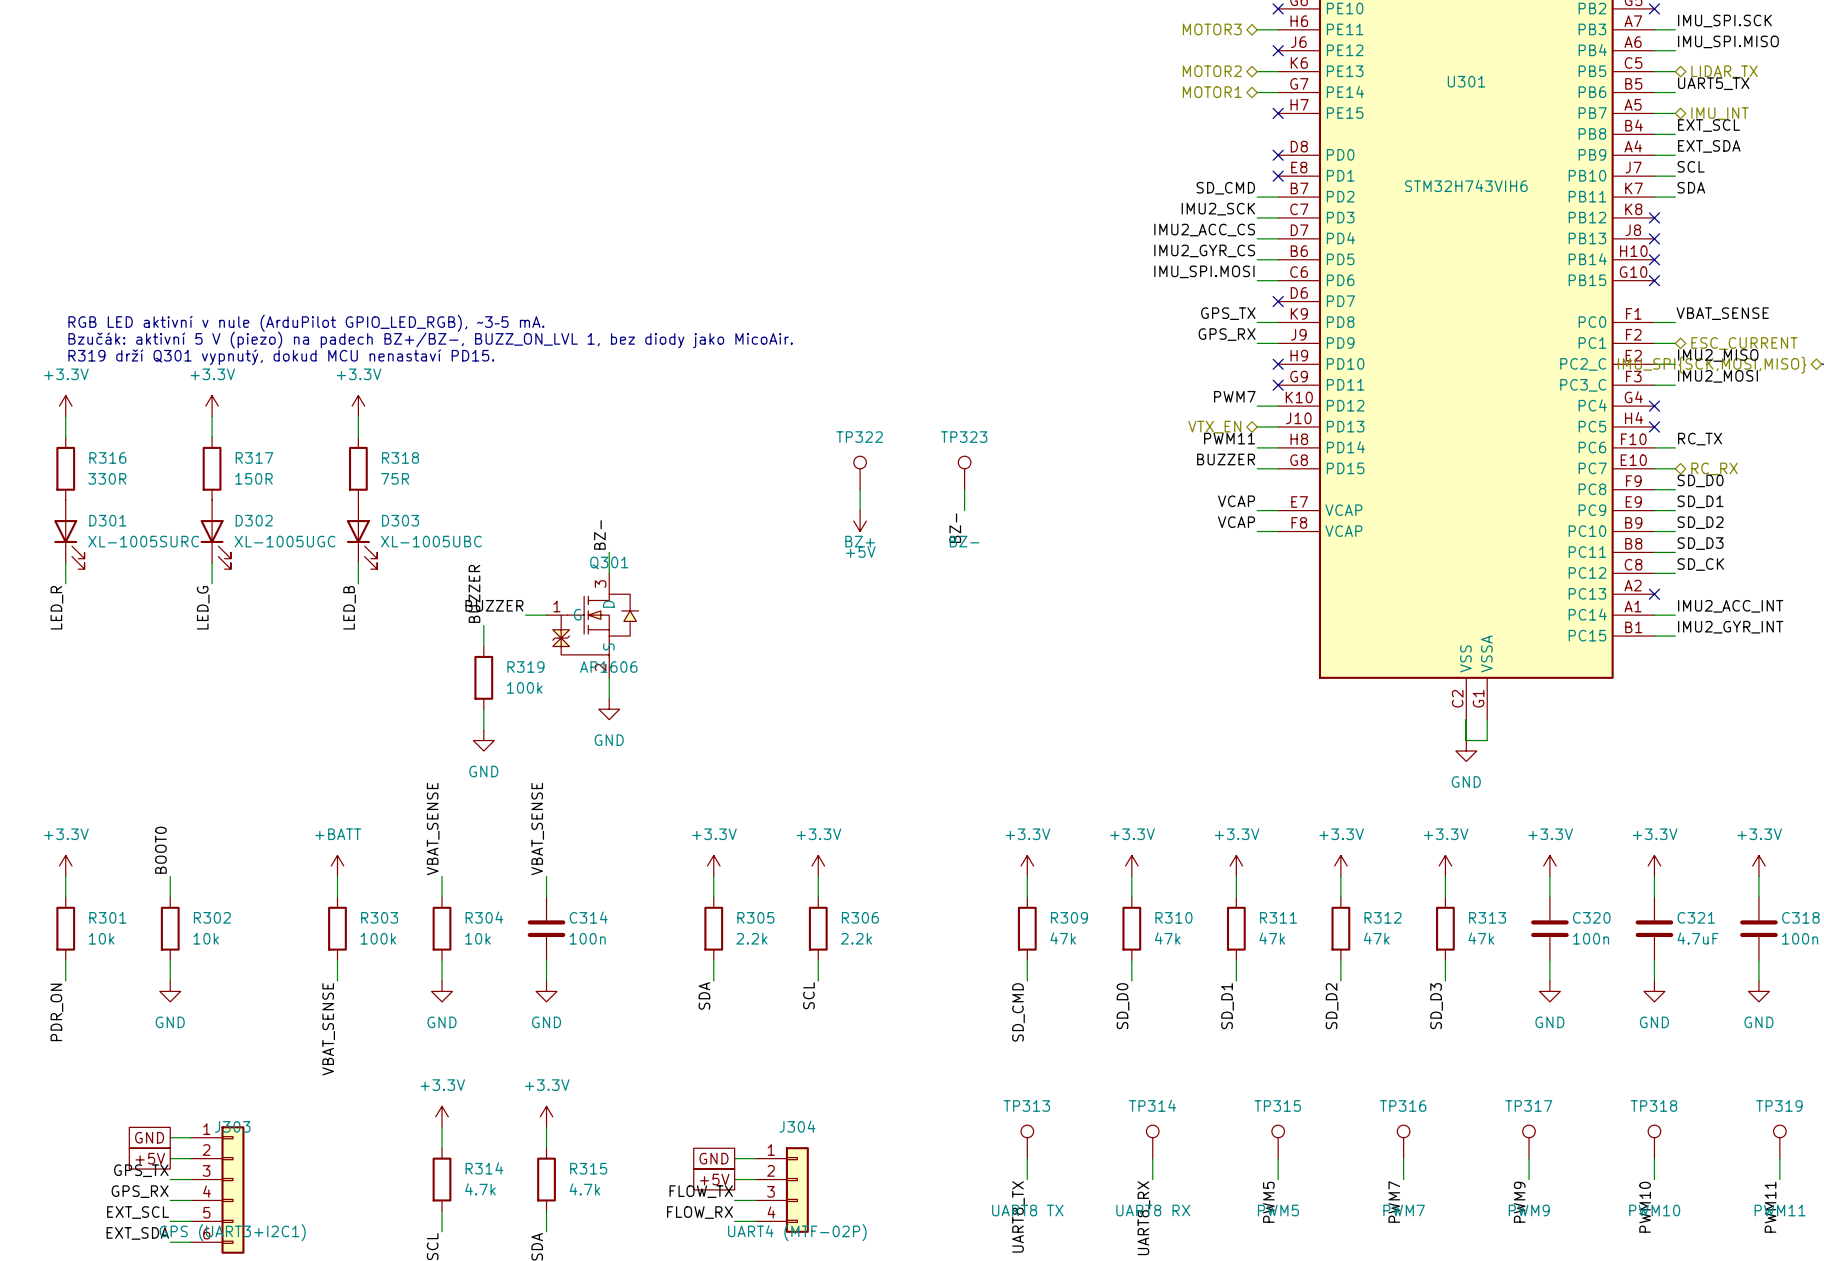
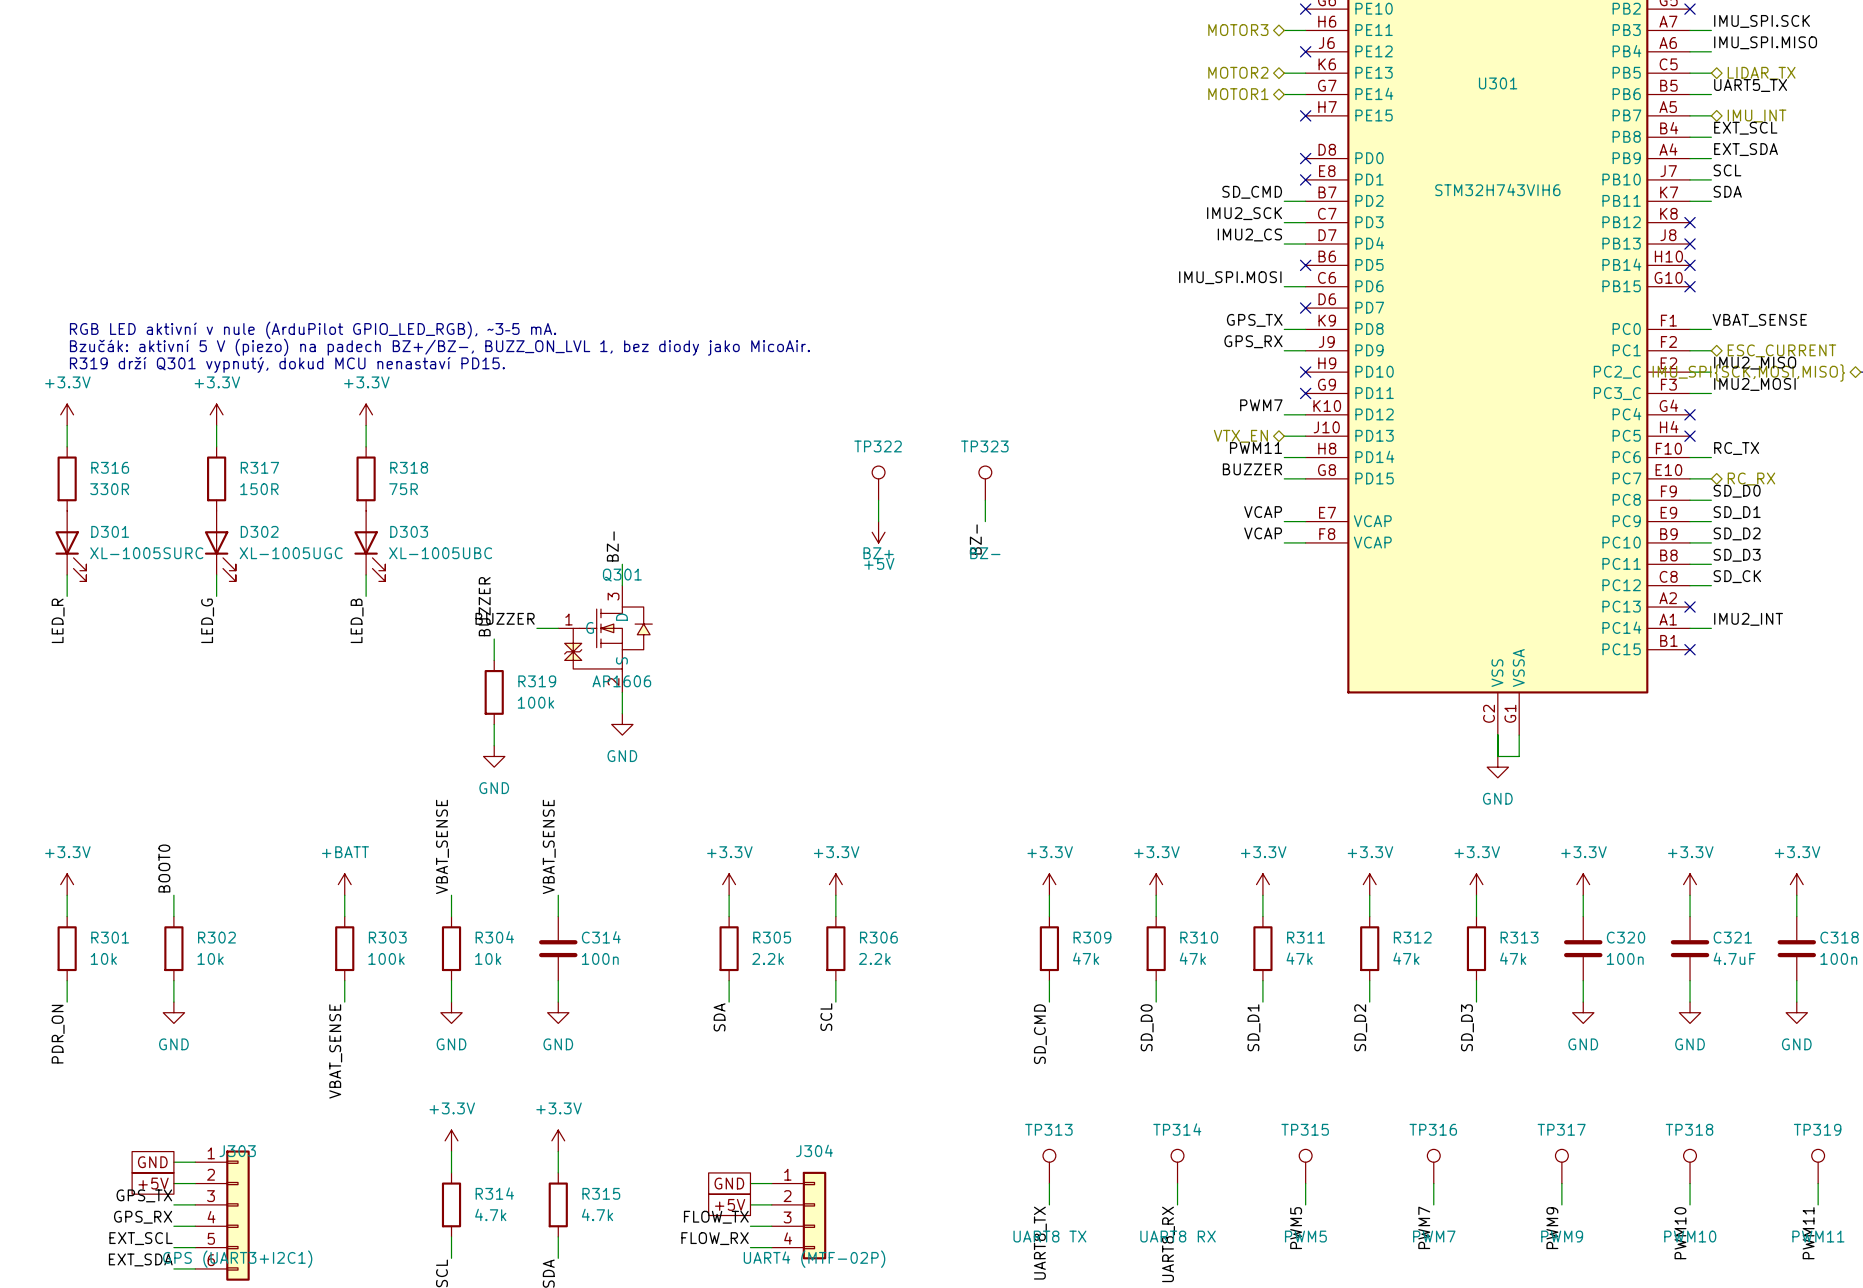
label: IMU2_ACC_CS (1204, 230) -> IMU2_CS (1249, 234)
label: IMU2_GYR_CS (1204, 250) -> none
wire: (1257, 259) (1278, 259) -> none
no-connect mark: none -> (1305, 265)
label: IMU2_ACC_INT (1730, 606) -> IMU2_INT (1748, 619)
label: IMU2_GYR_INT (1730, 627) -> none
wire: (1654, 636) (1675, 636) -> none
no-connect mark: none -> (1690, 649)

